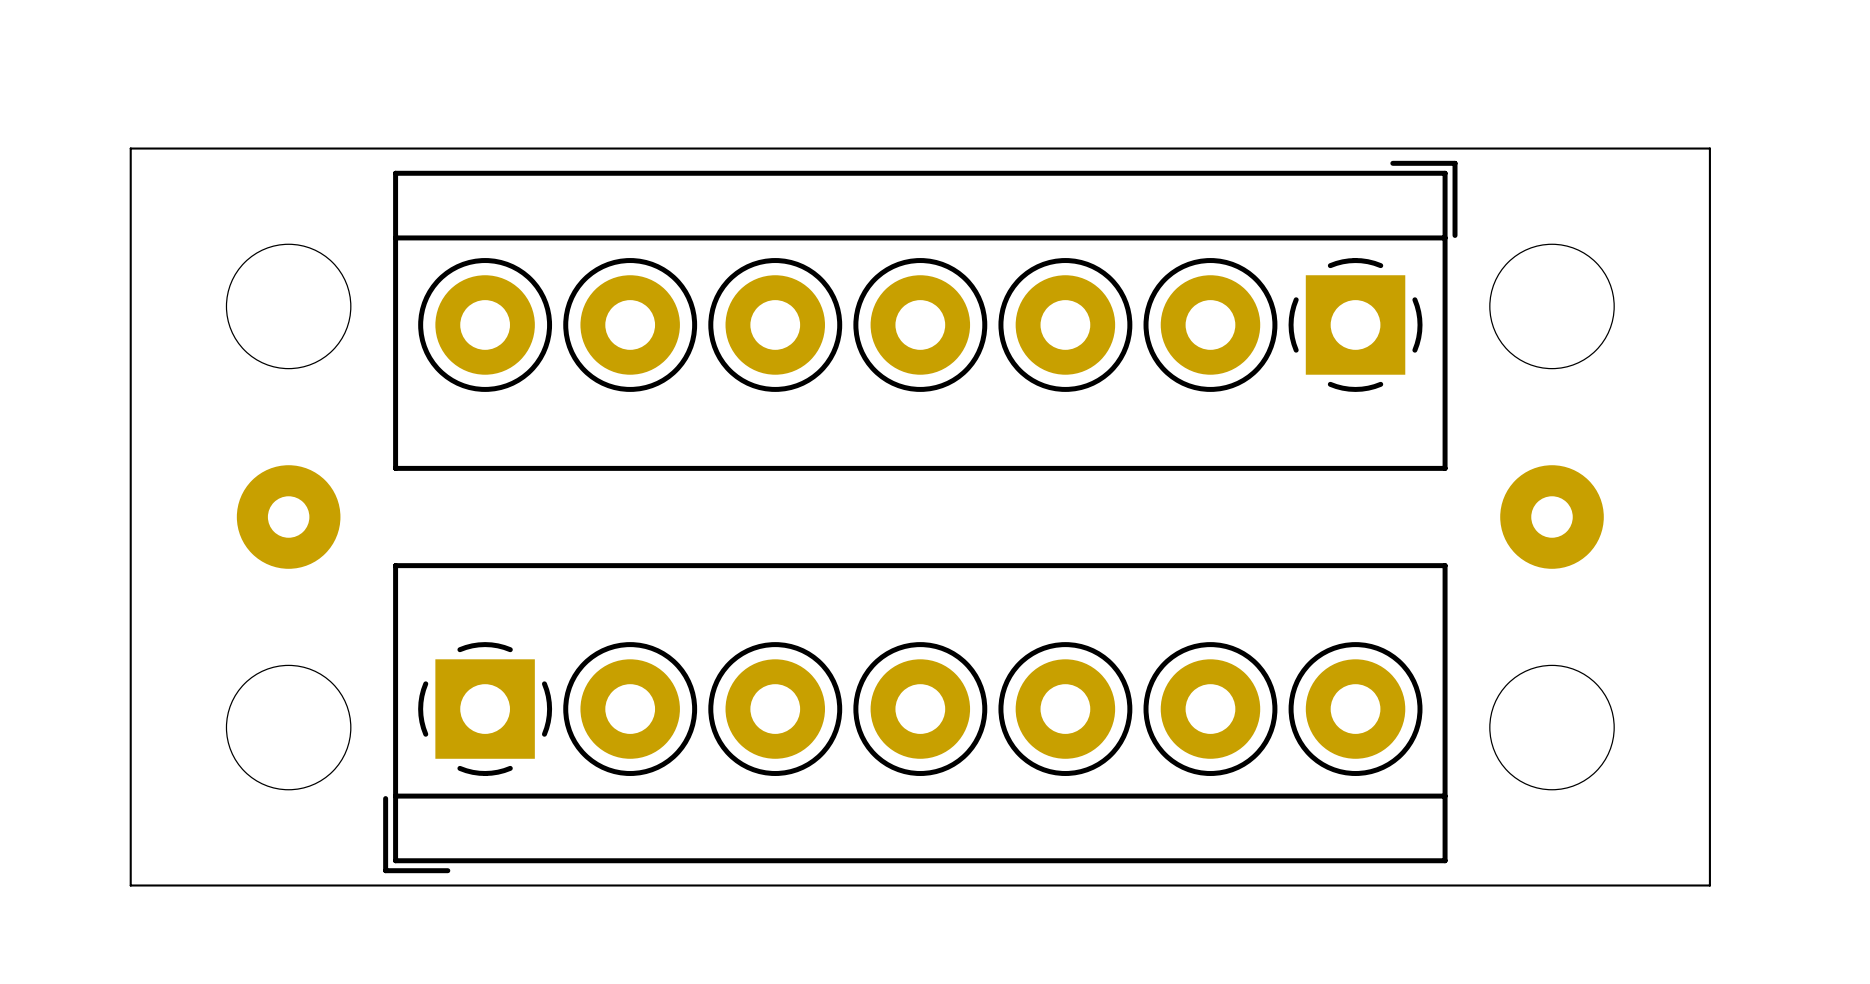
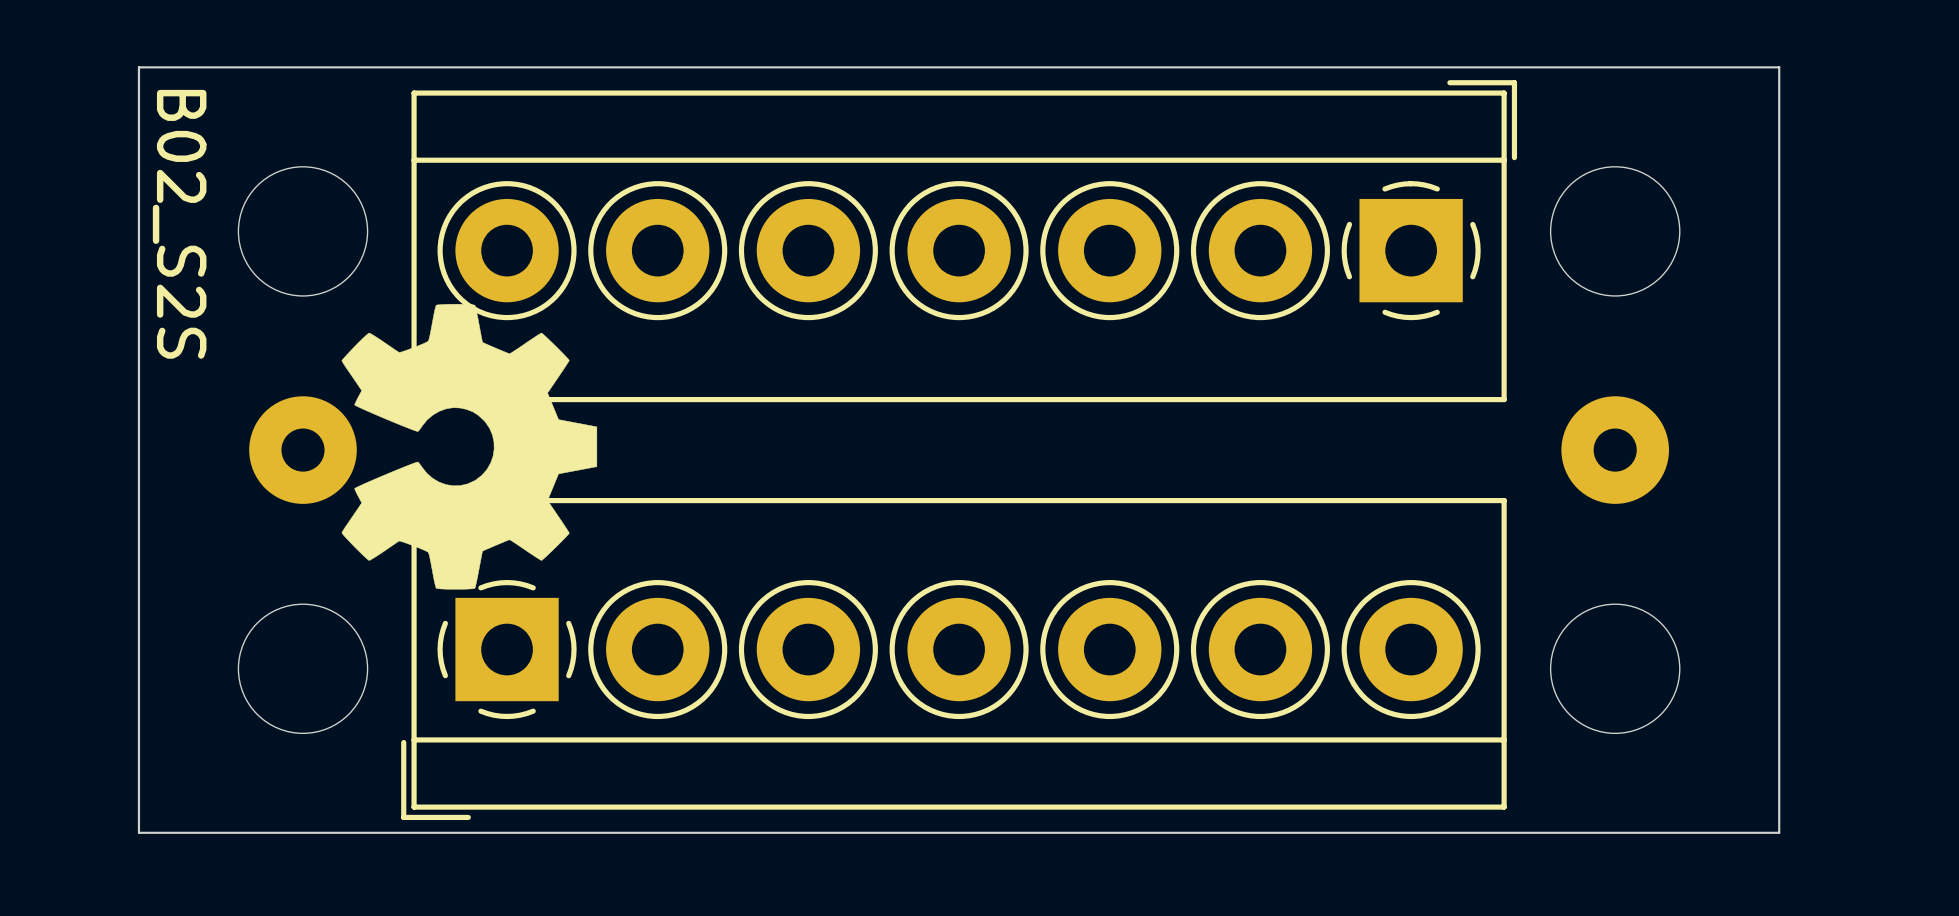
text: none -> B02_S2S (179, 224)
drawing: none -> [341, 303, 598, 590]

